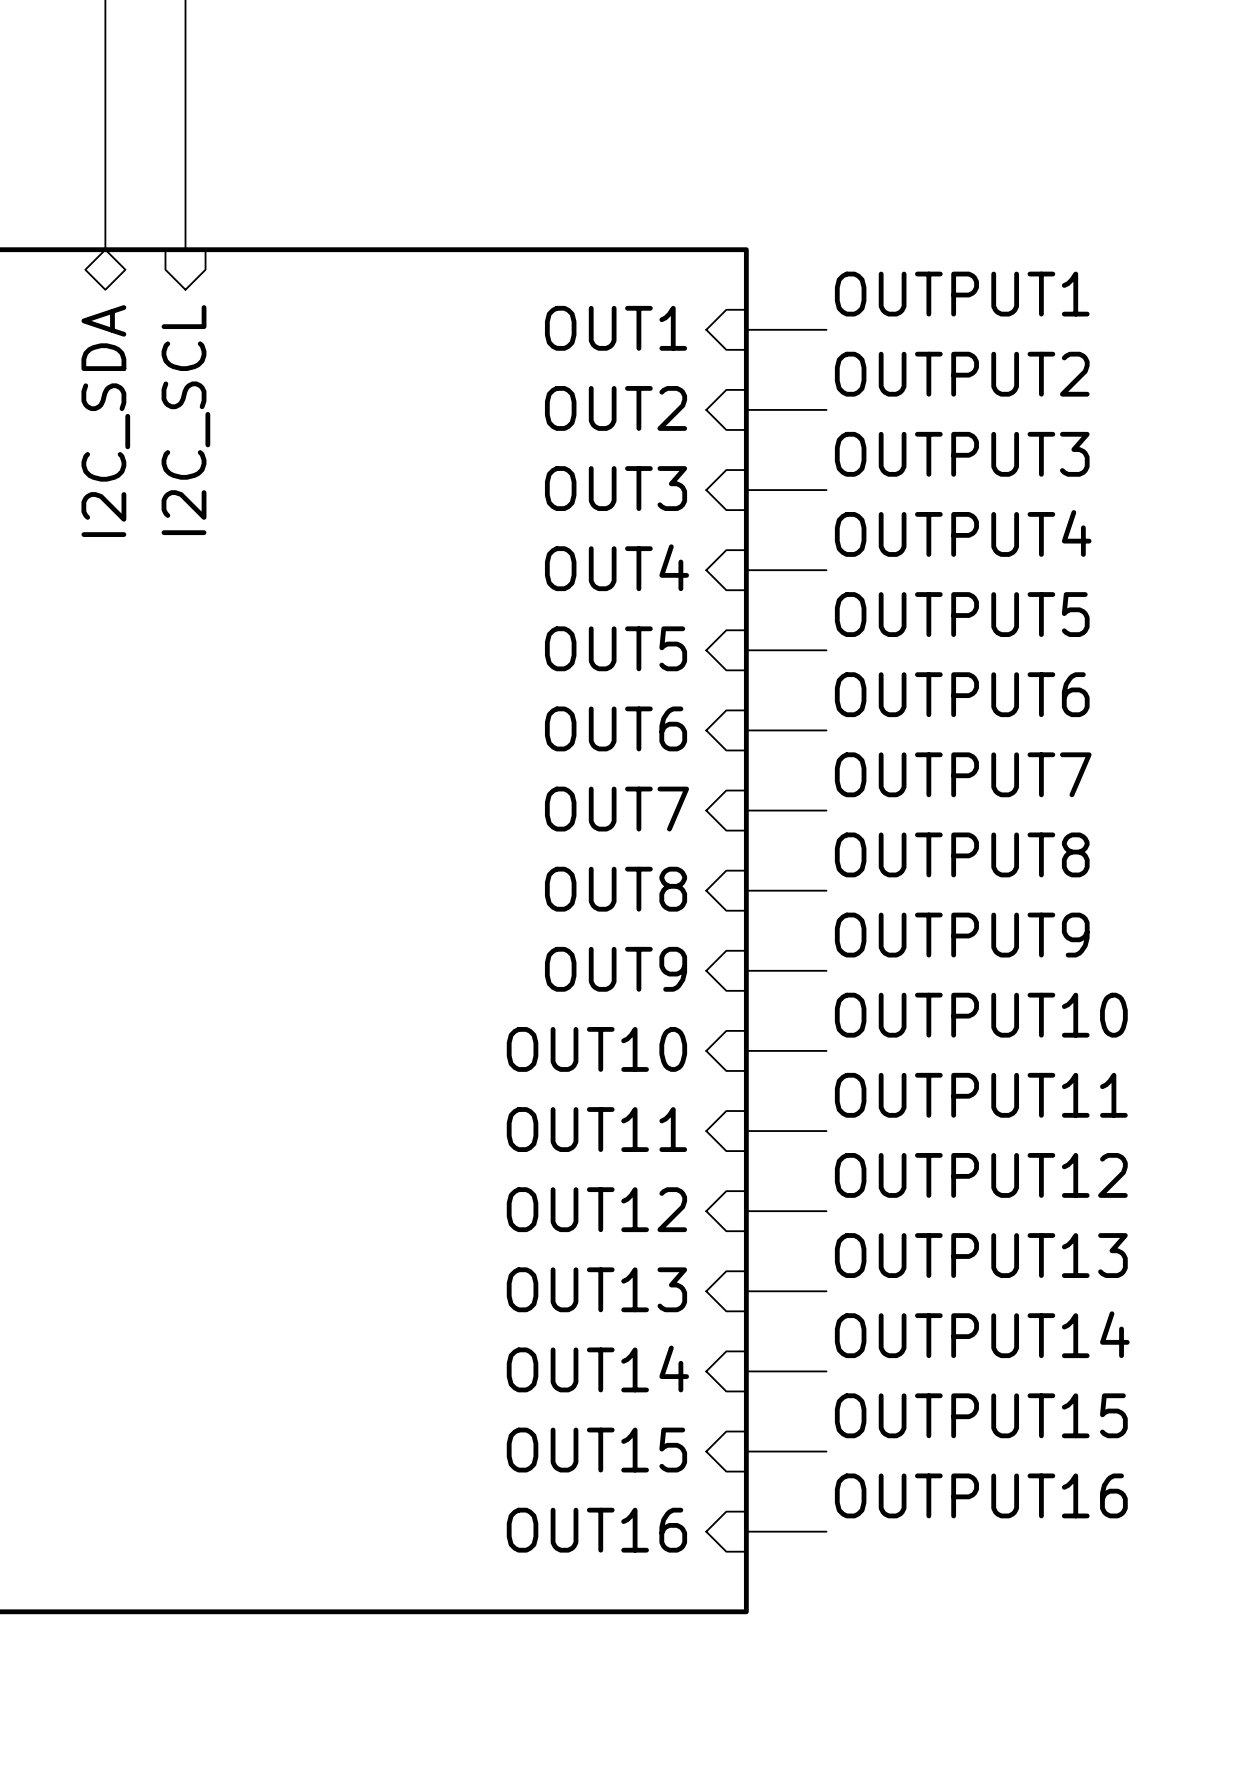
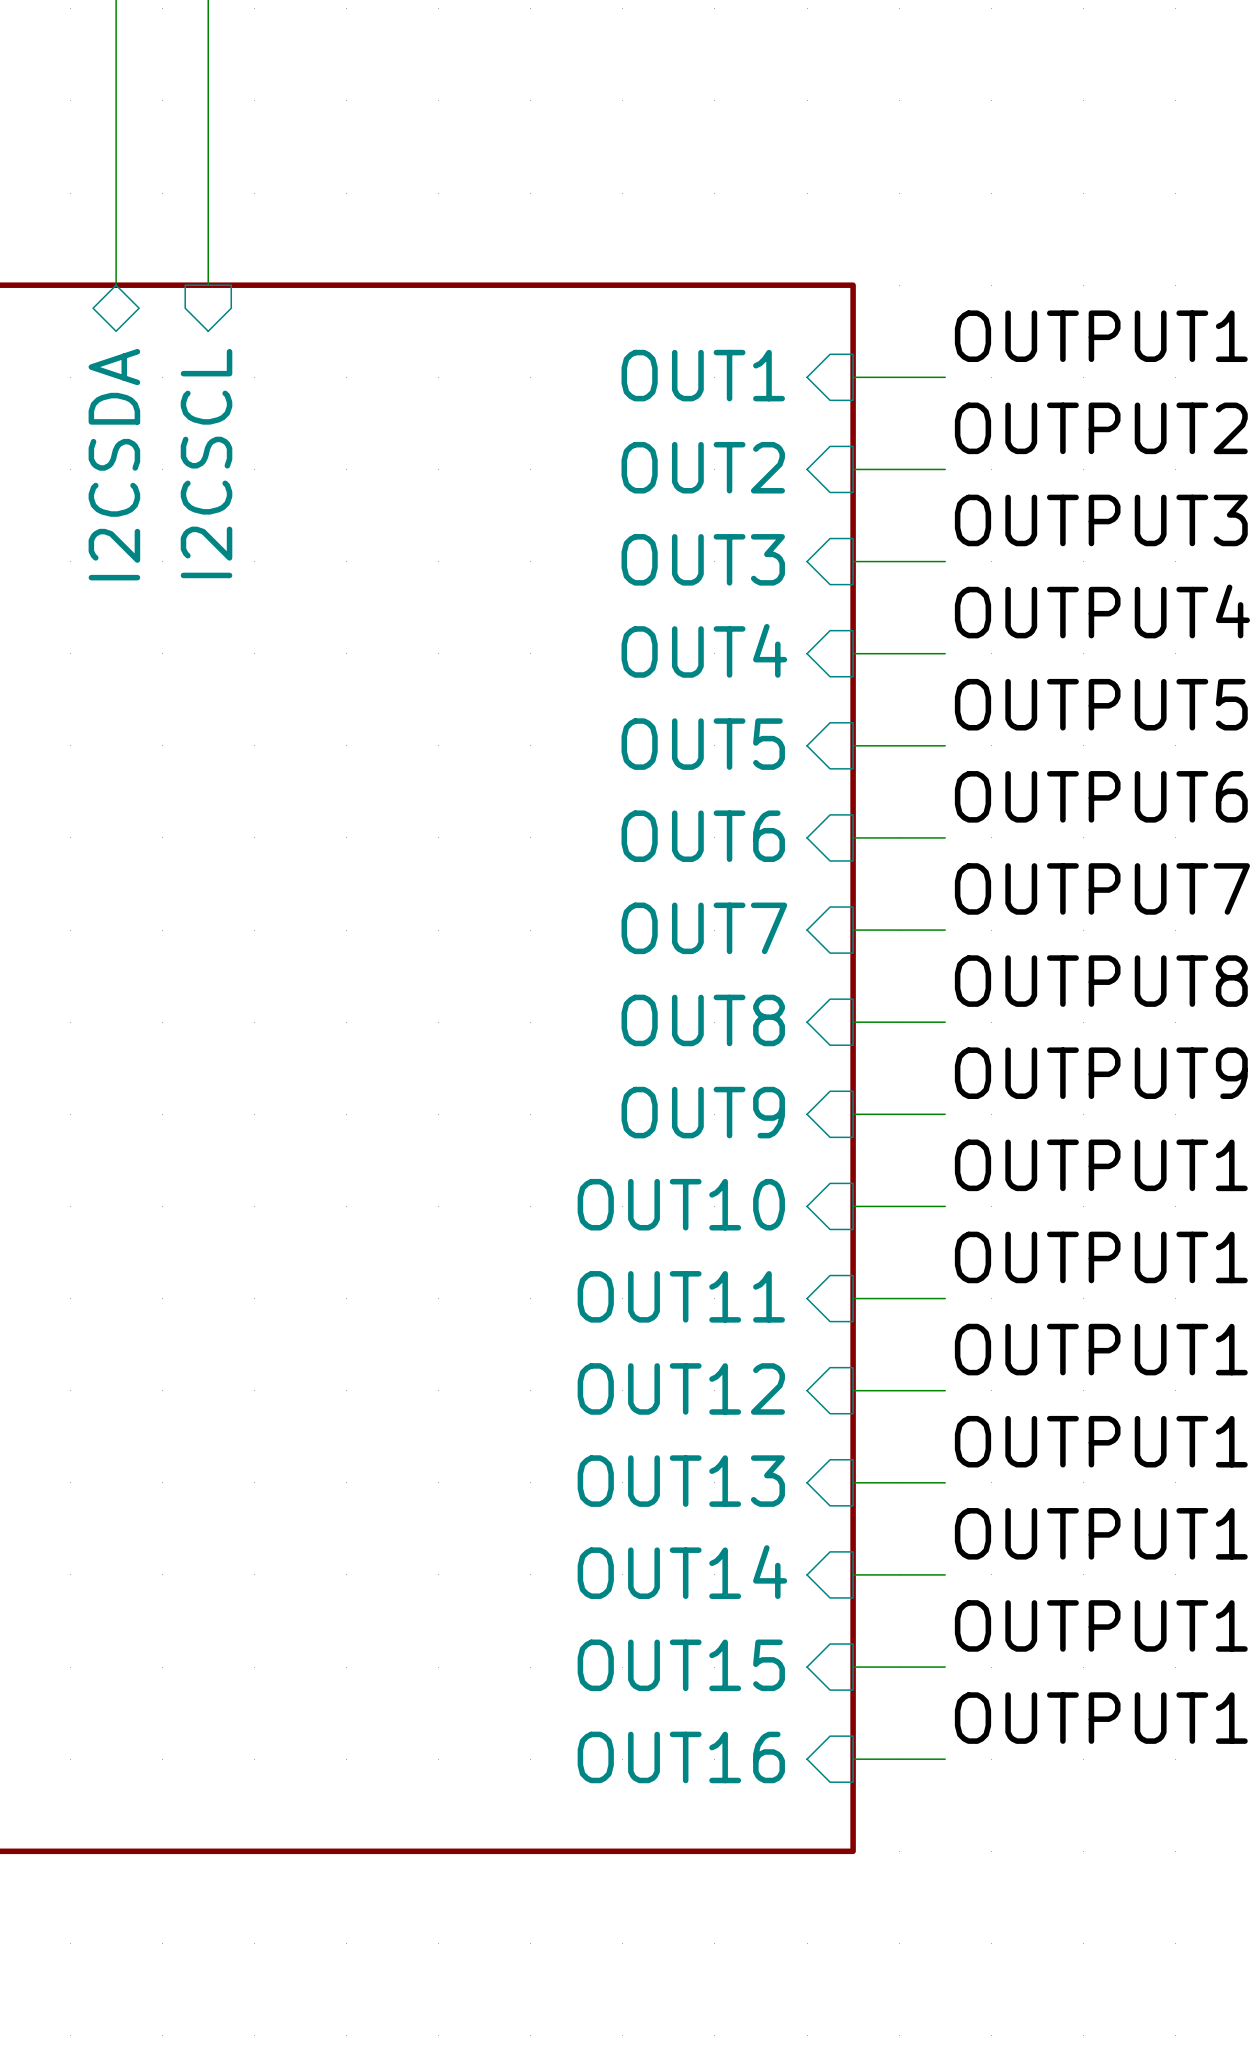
sheet pin: I2C_SCL (185, 420) -> I2CSCL (206, 463)
sheet pin: I2C_SDA (105, 421) -> I2CSDA (114, 464)

